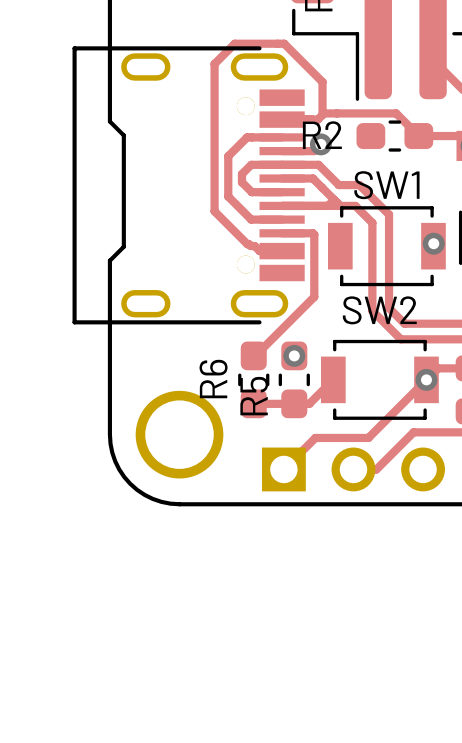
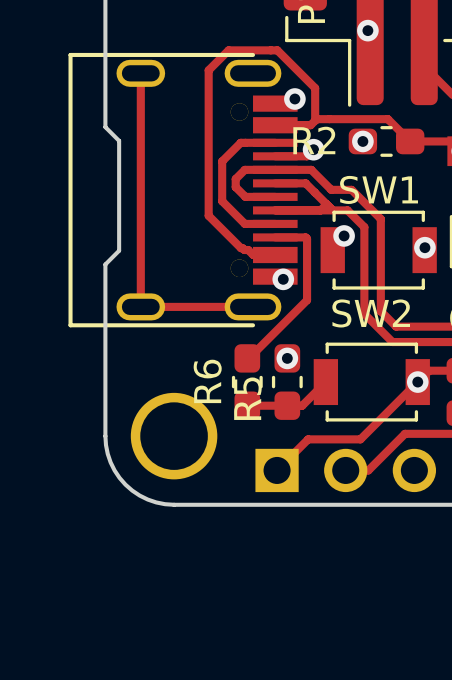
via: none -> (367, 30)
track: none -> (140, 73) (140, 306) (253, 306)
via: none -> (294, 99)
via: none -> (362, 141)
via: none -> (344, 235)
via: none -> (283, 279)

